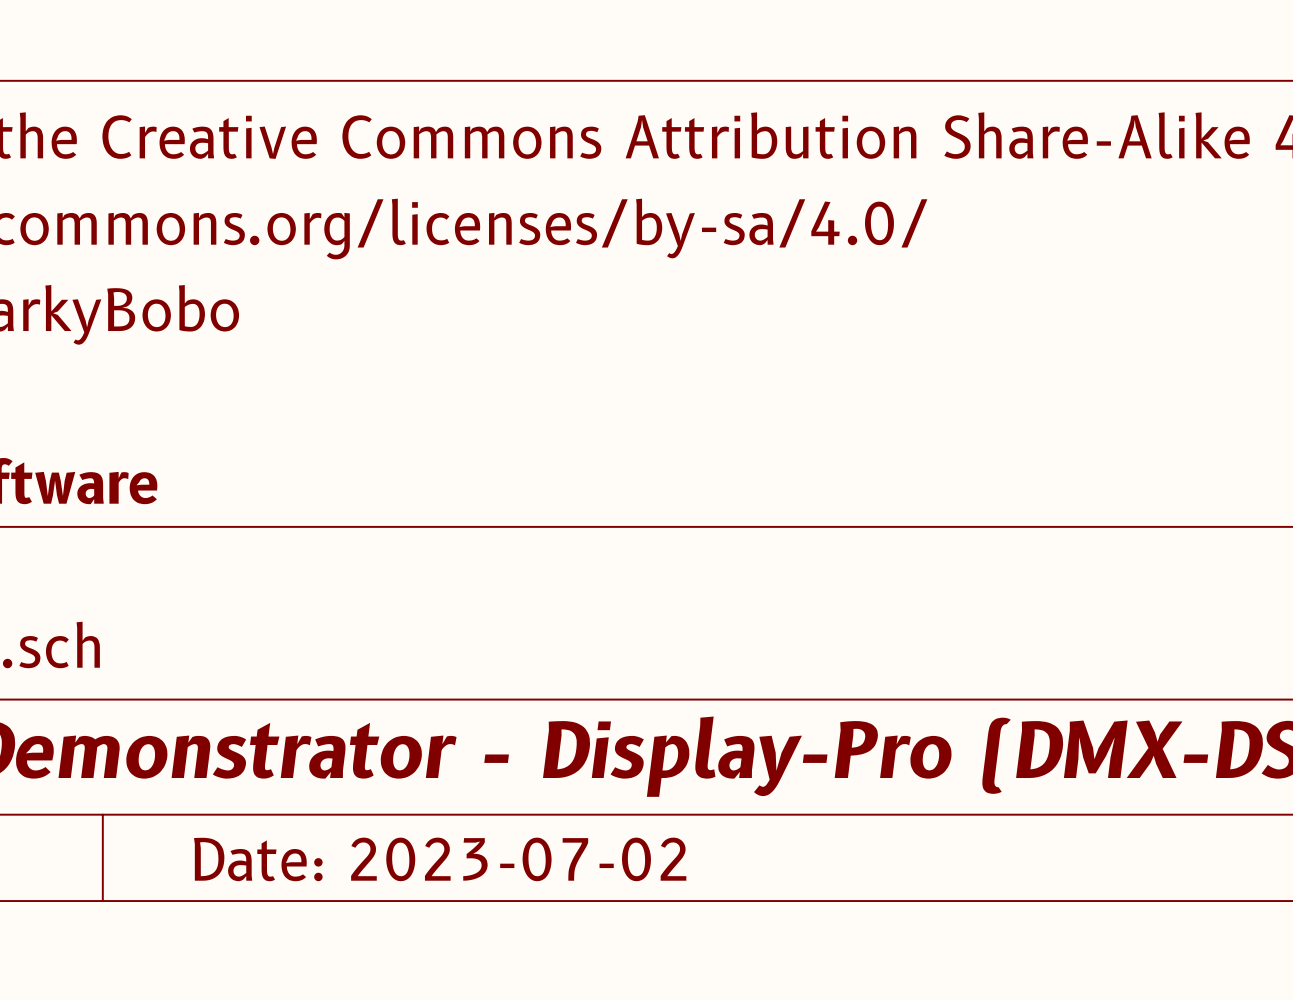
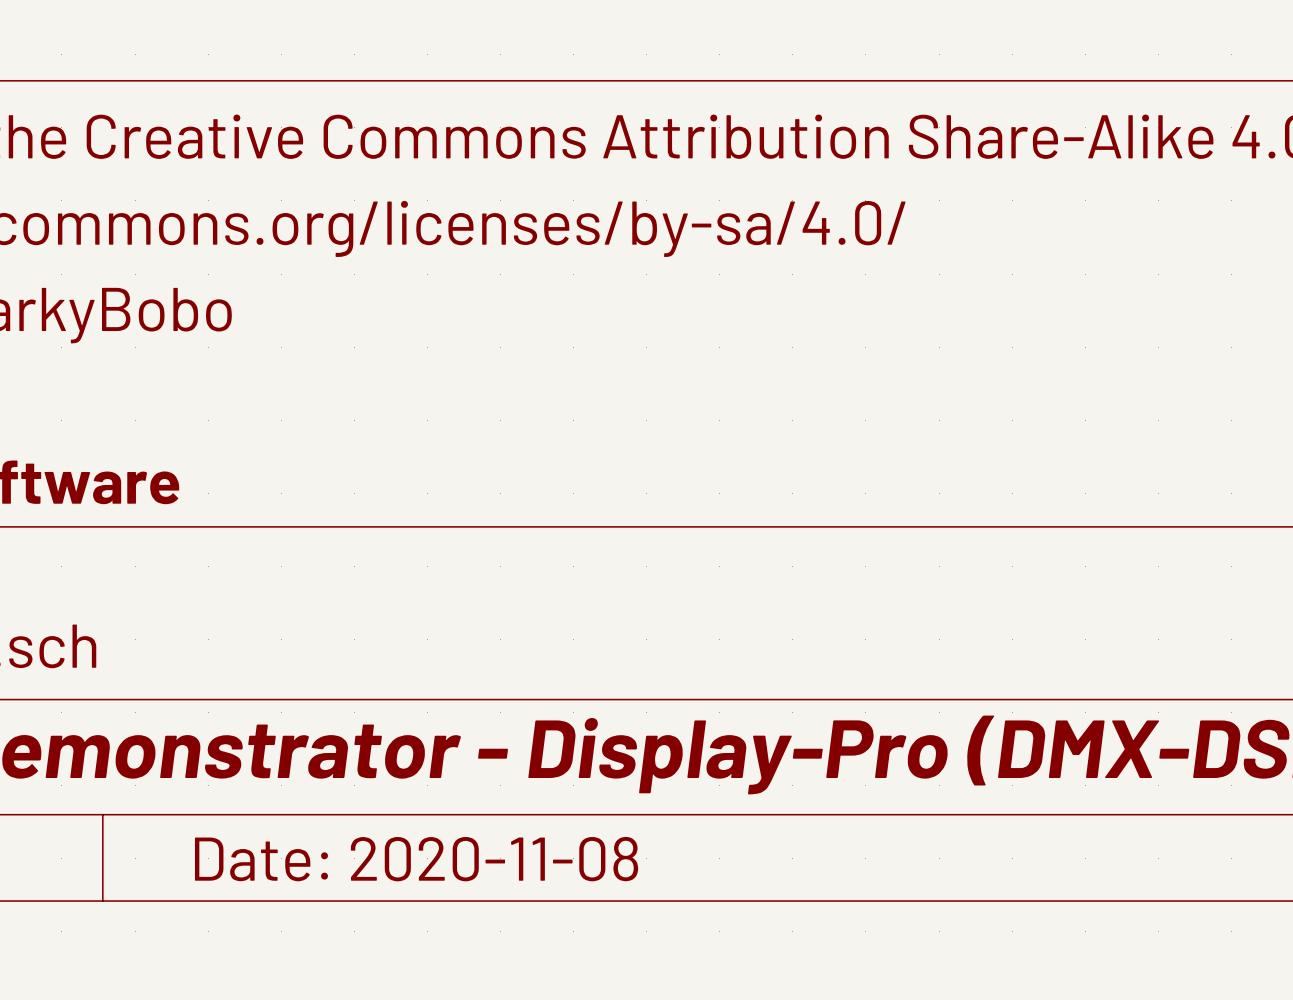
title block: Date: 2023-07-02 (440, 859) -> Date: 2020-11-08 (416, 859)

